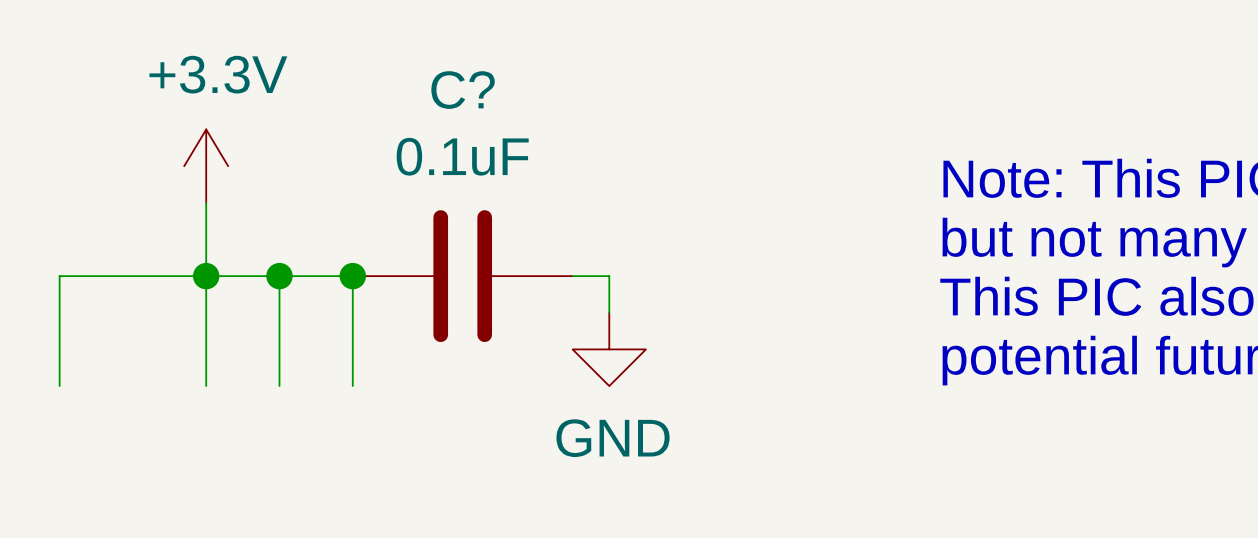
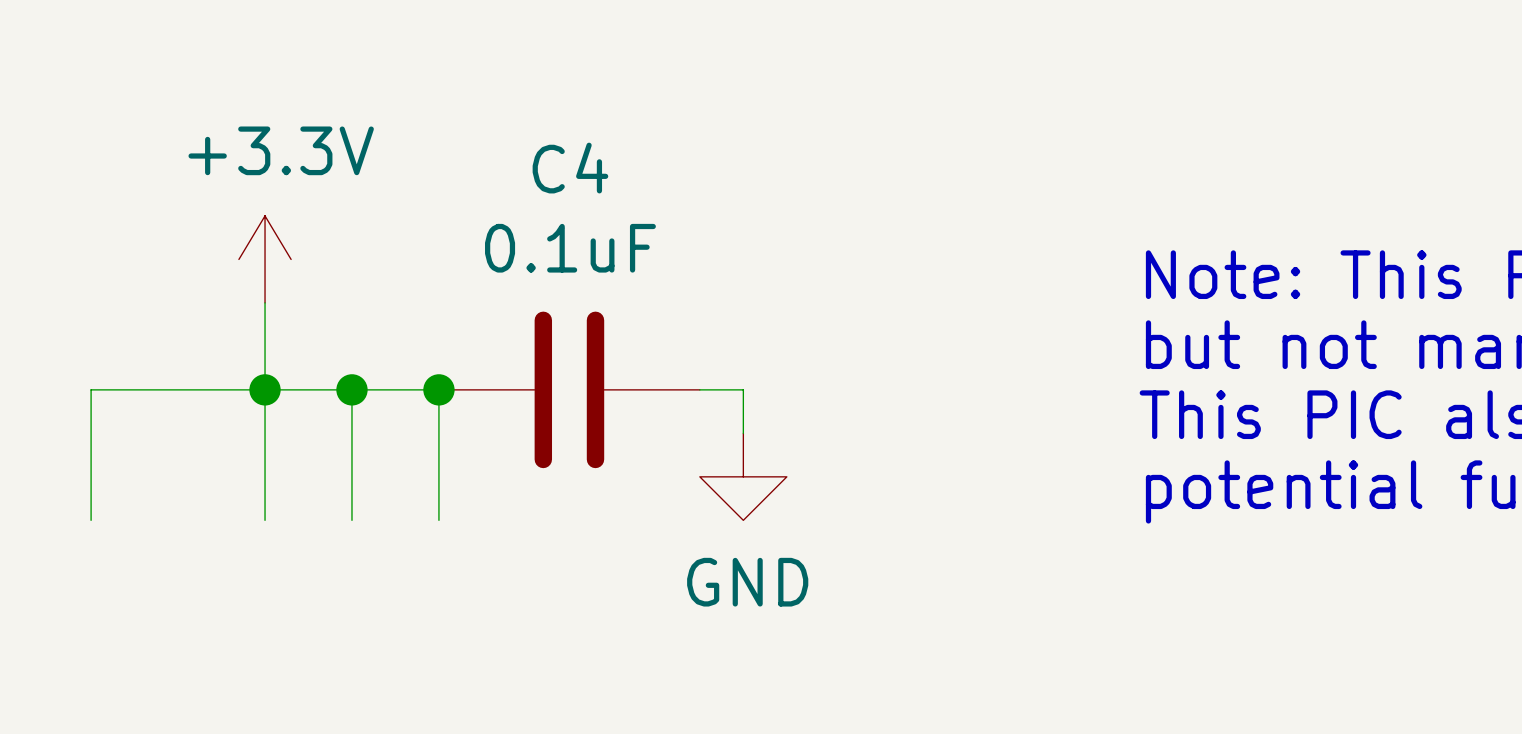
C? name: C? (463, 90) -> C4 (570, 168)

